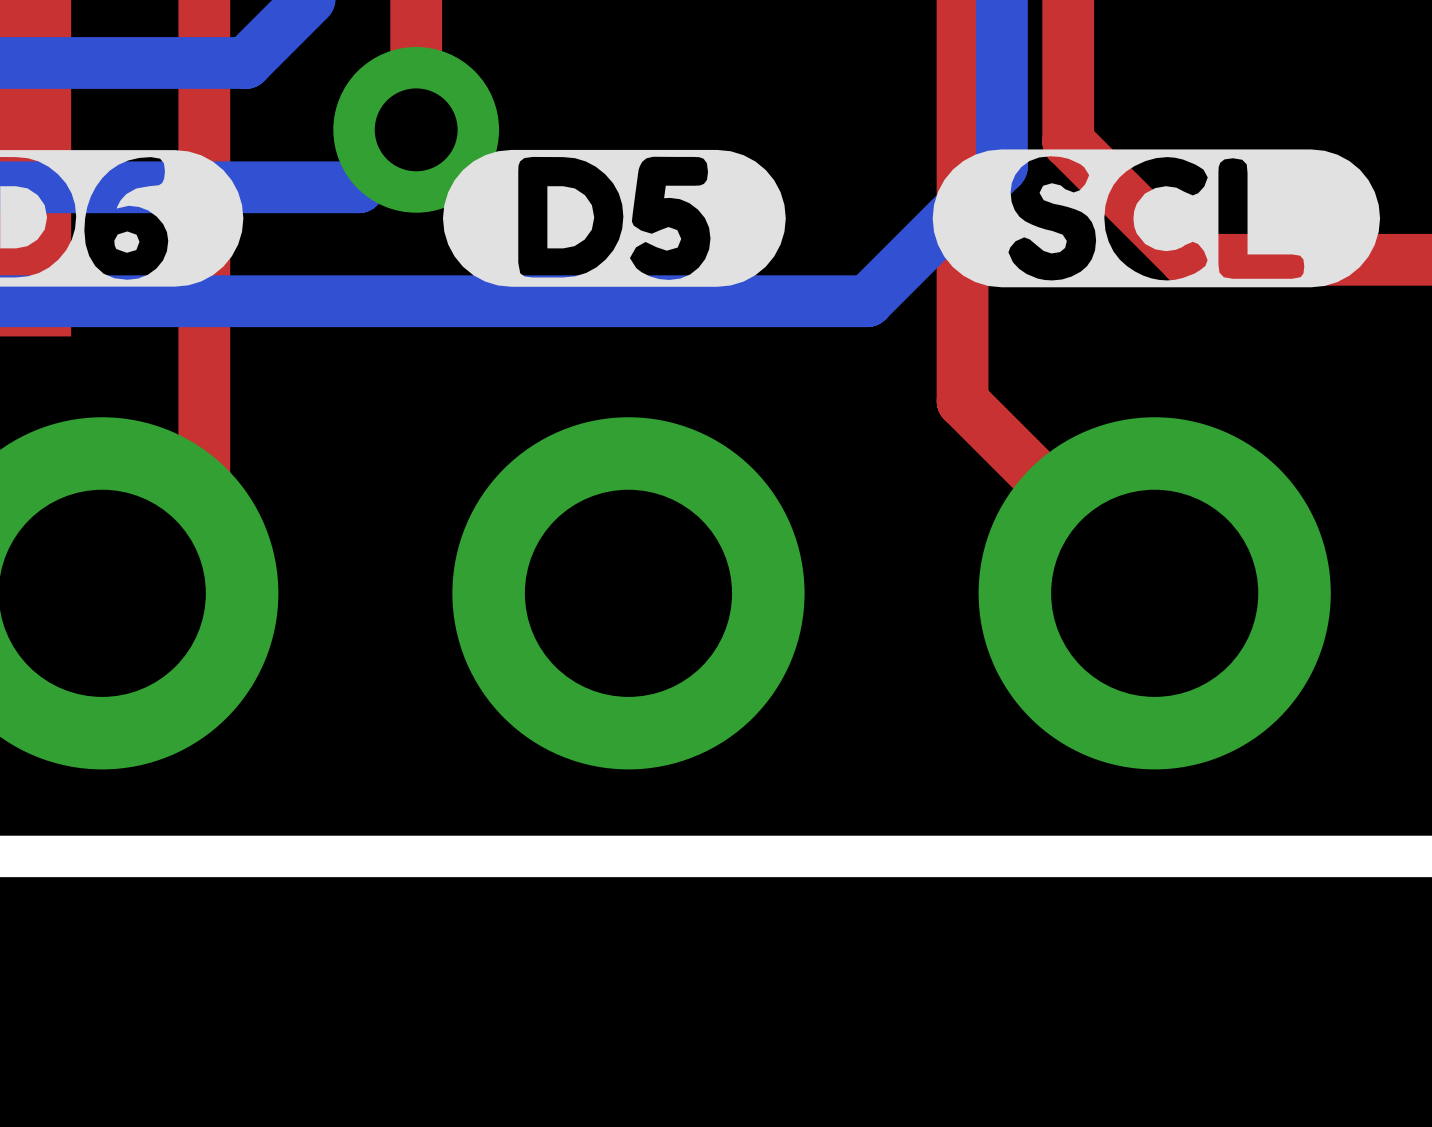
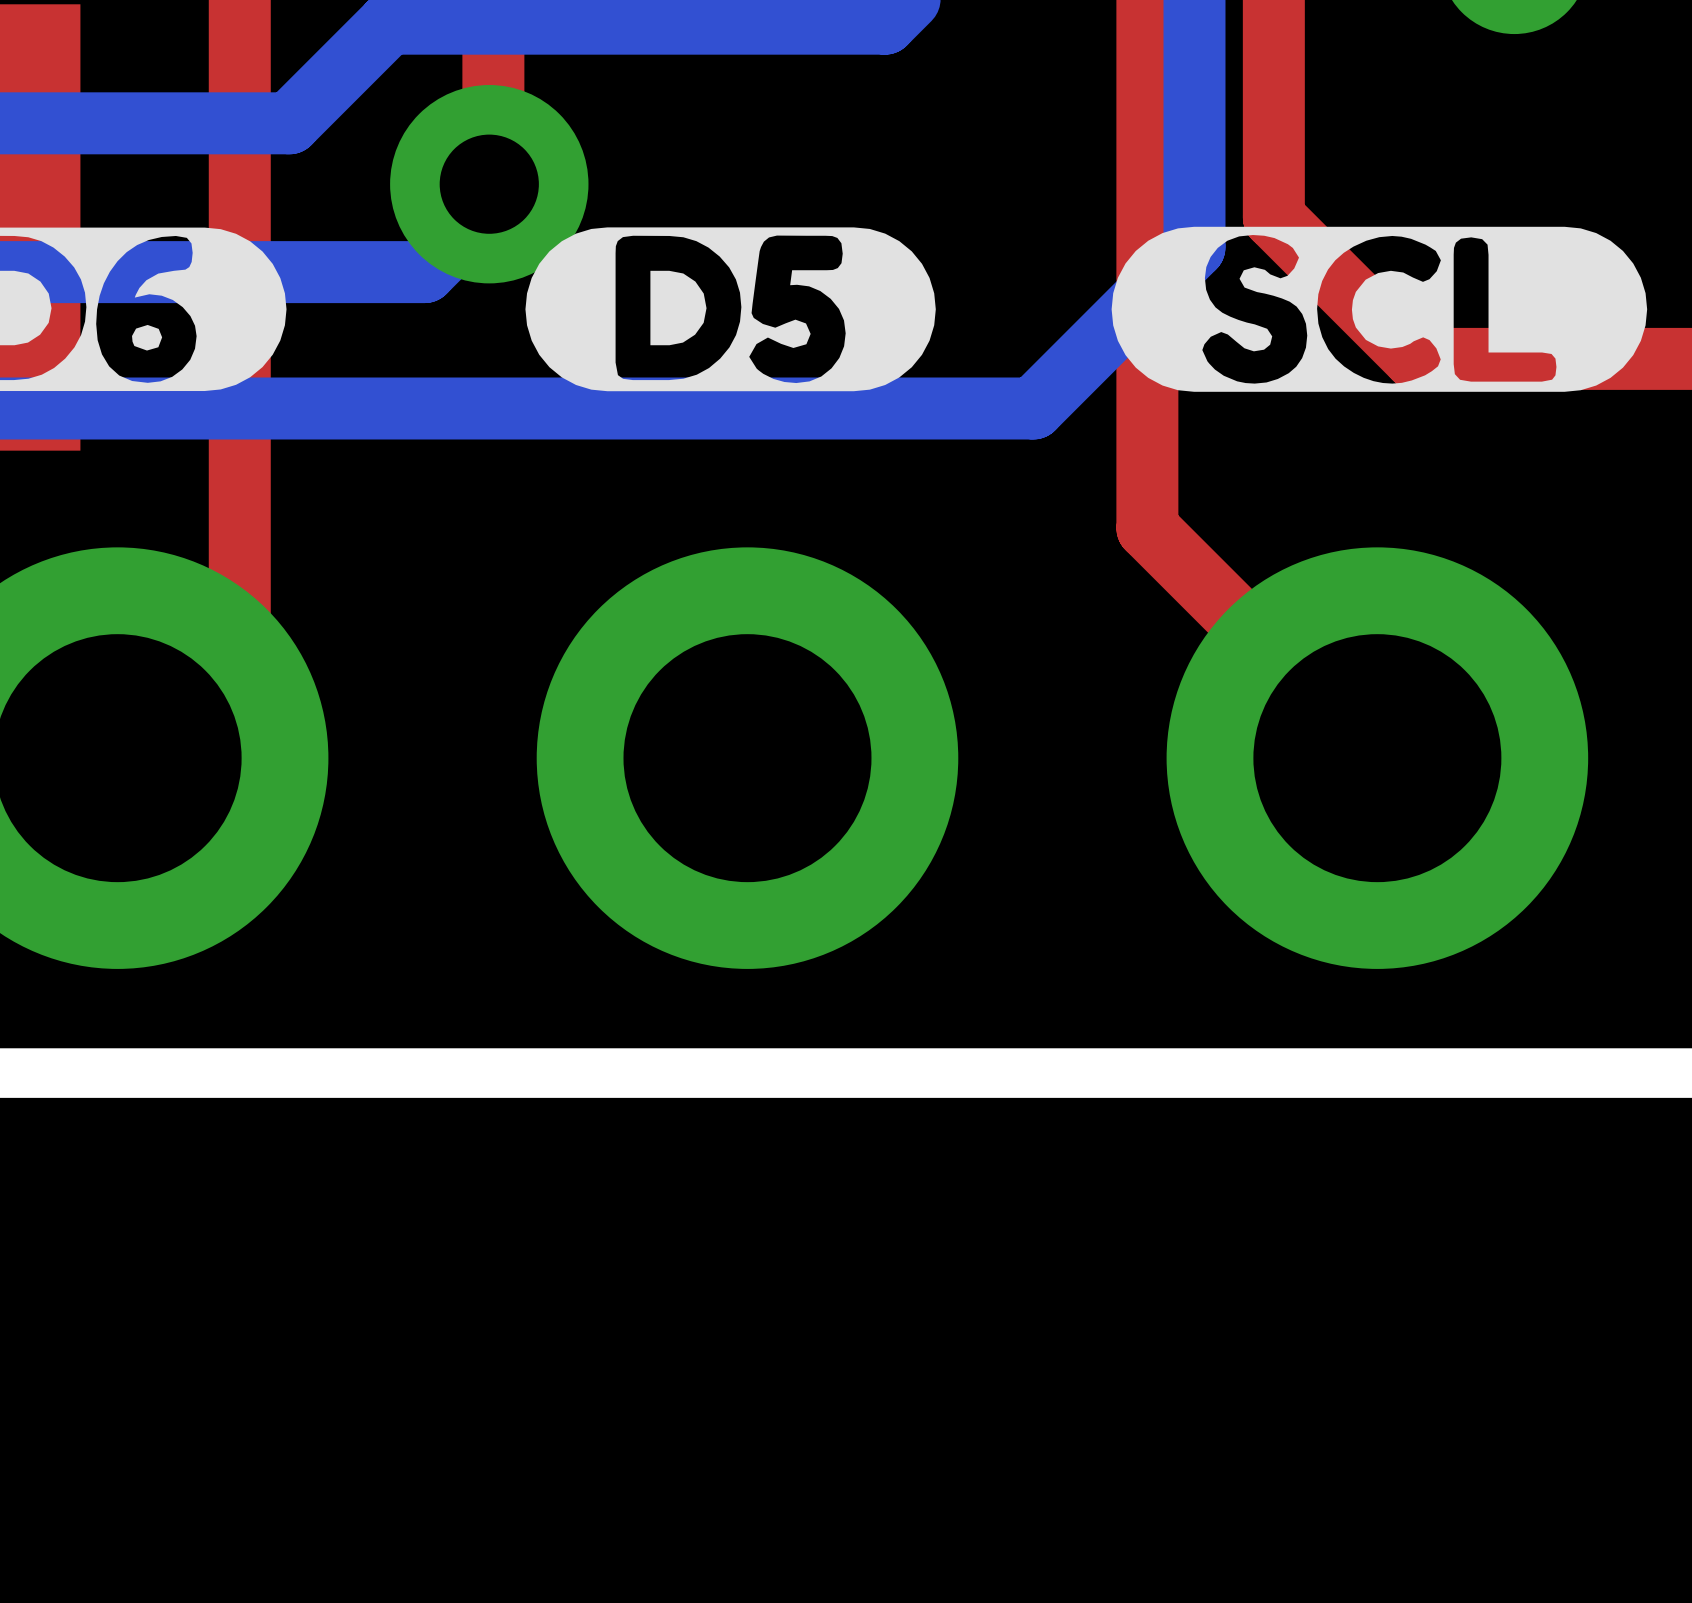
via position: (416, 129) -> (489, 184)

